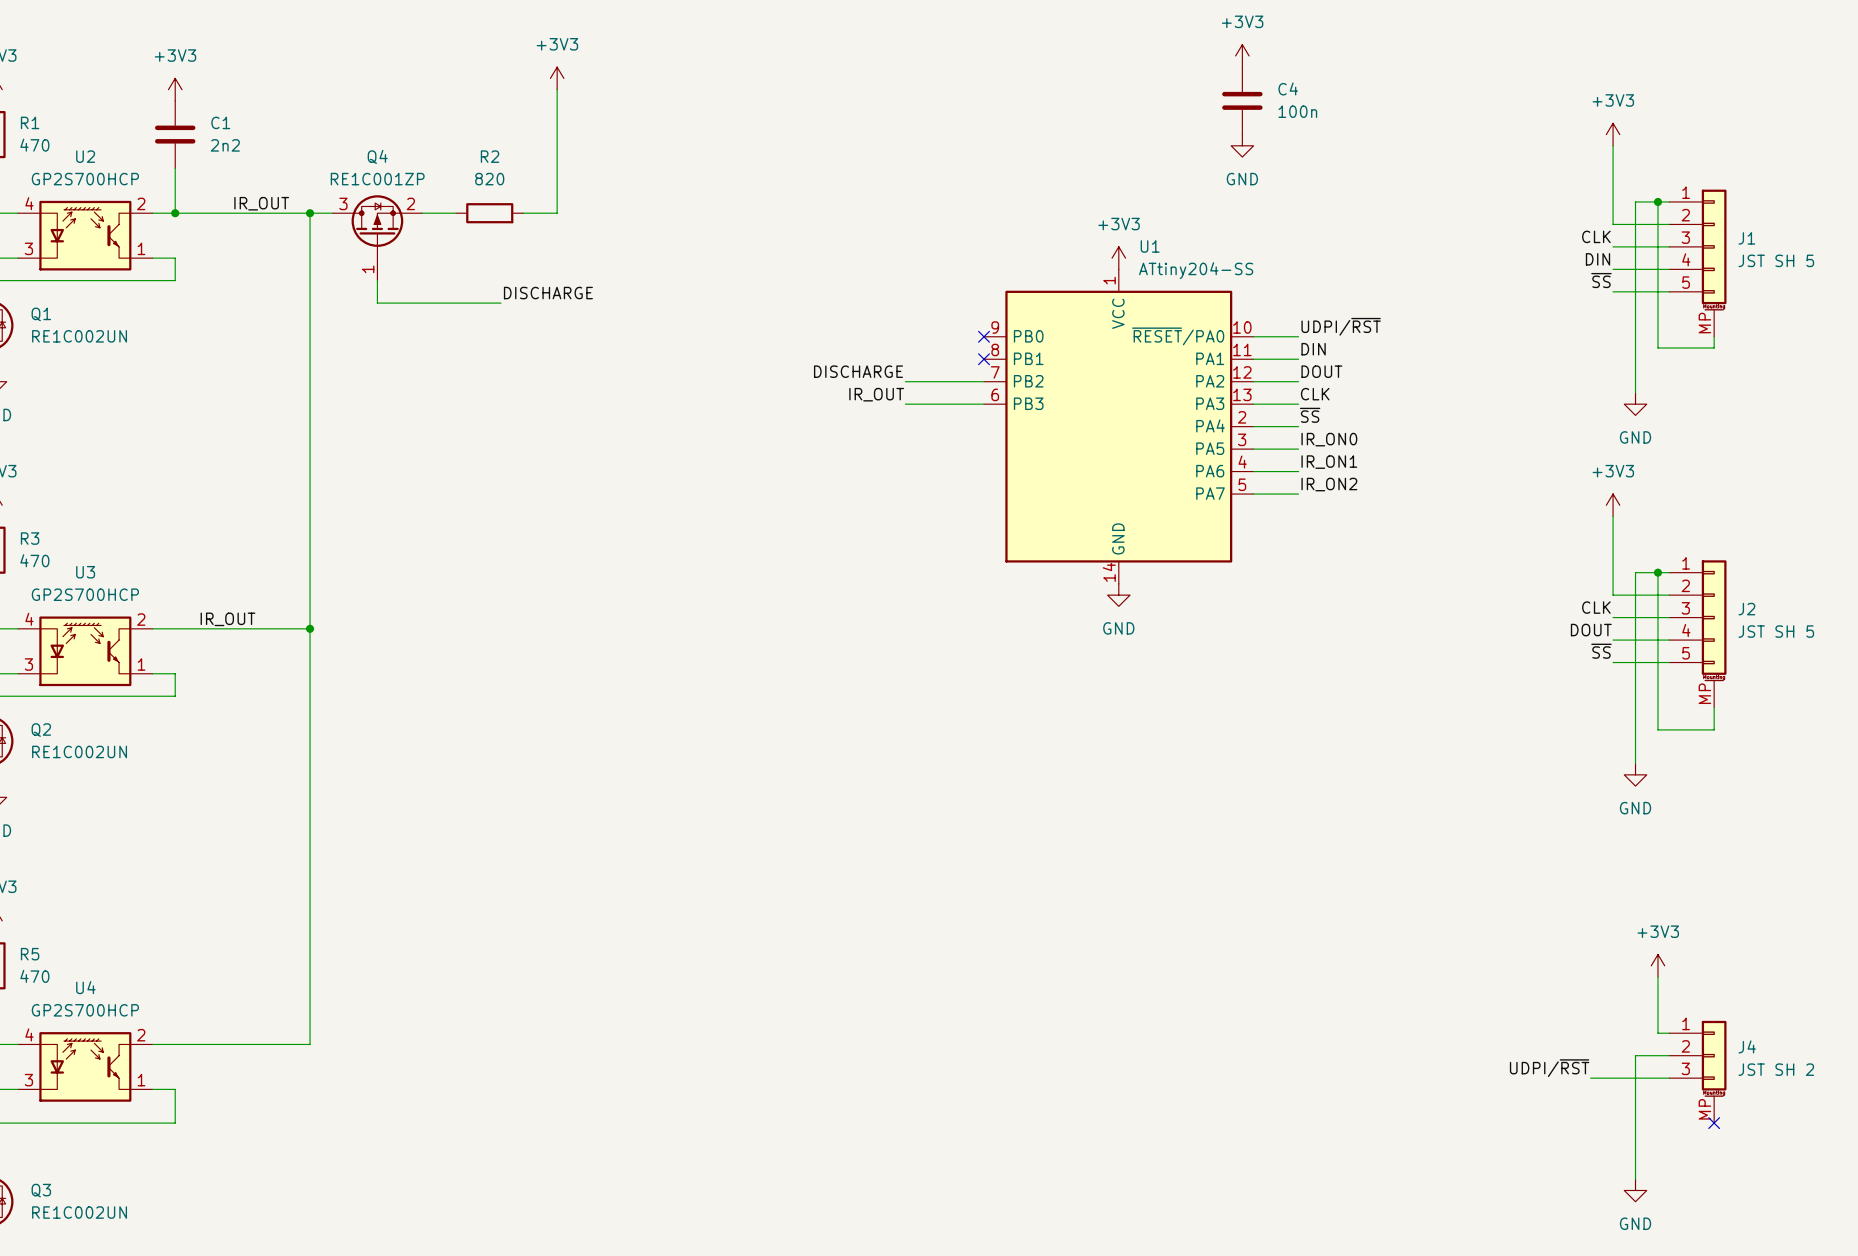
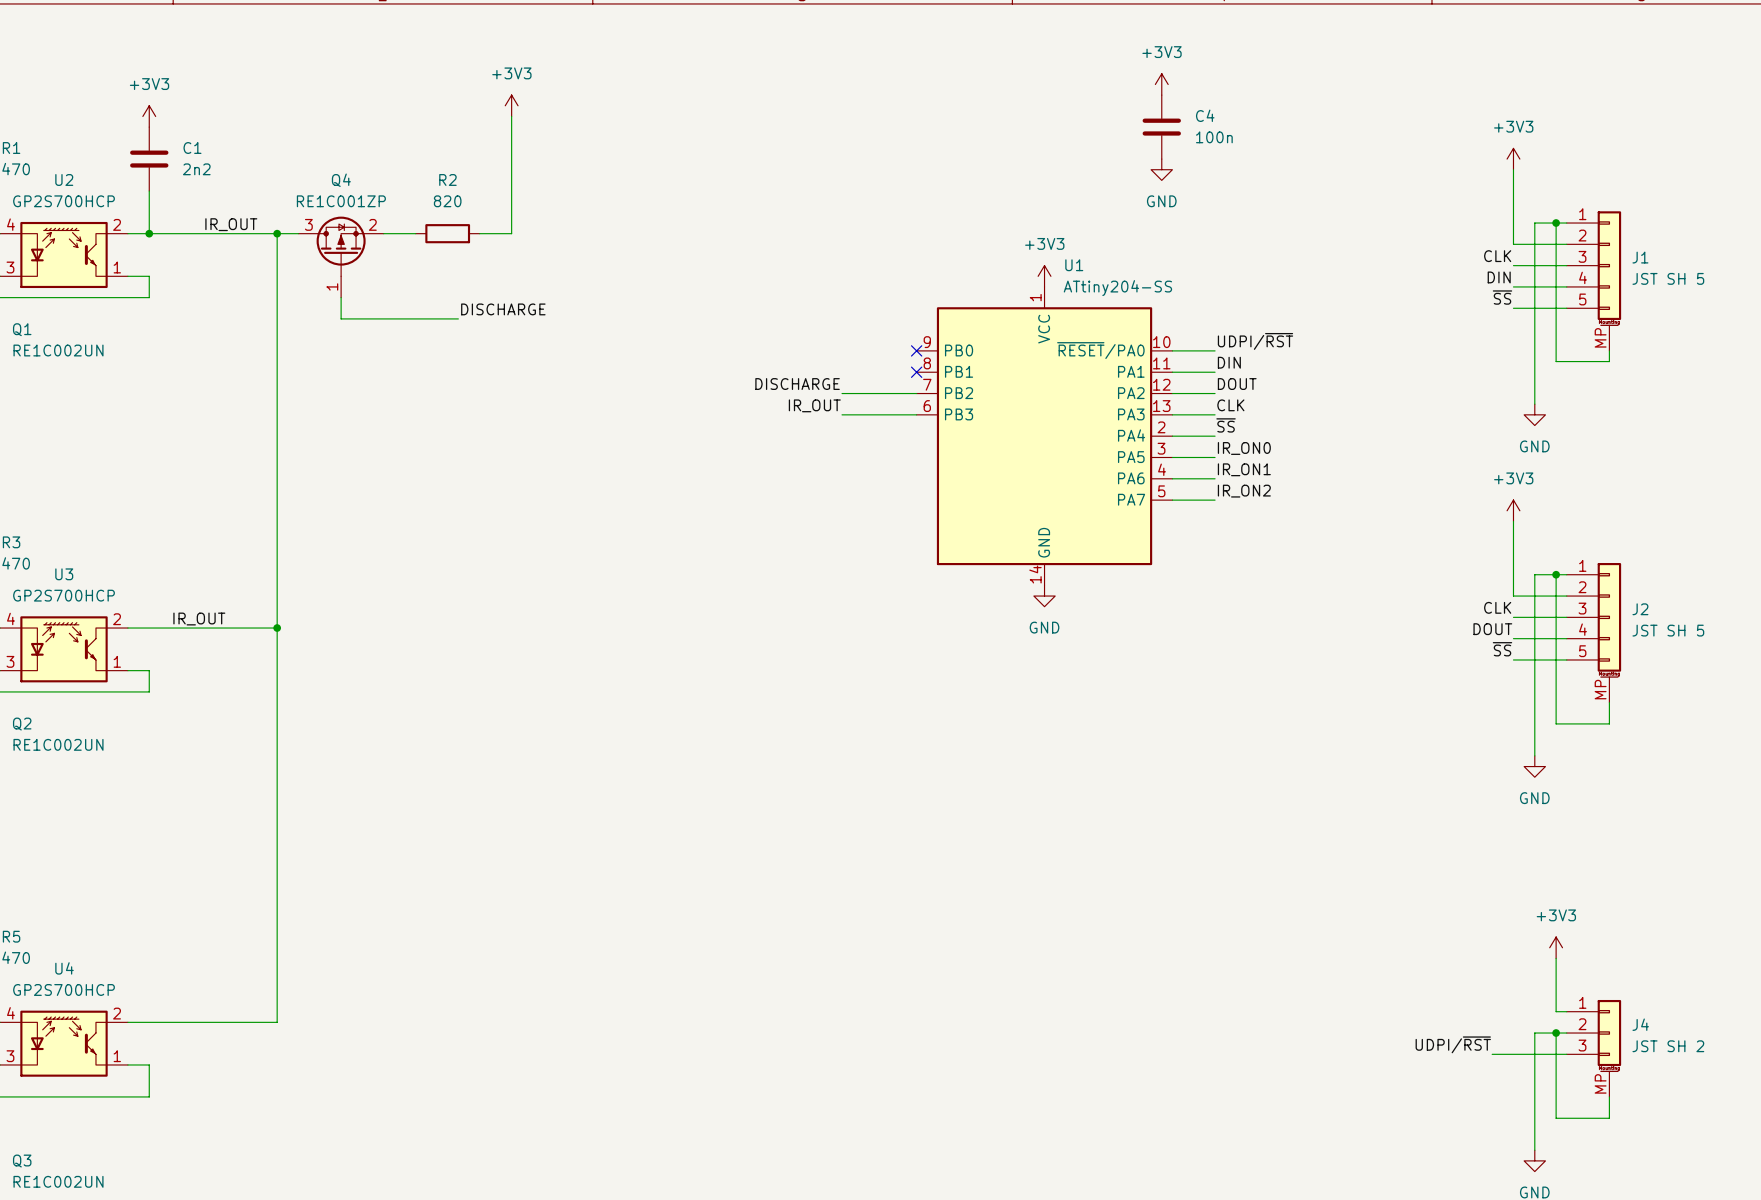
wire: none -> (1556, 1033) (1556, 1118) (1609, 1118) (1609, 1096)
junction: none -> (1556, 1033)
no-connect mark: (1714, 1123) -> none

